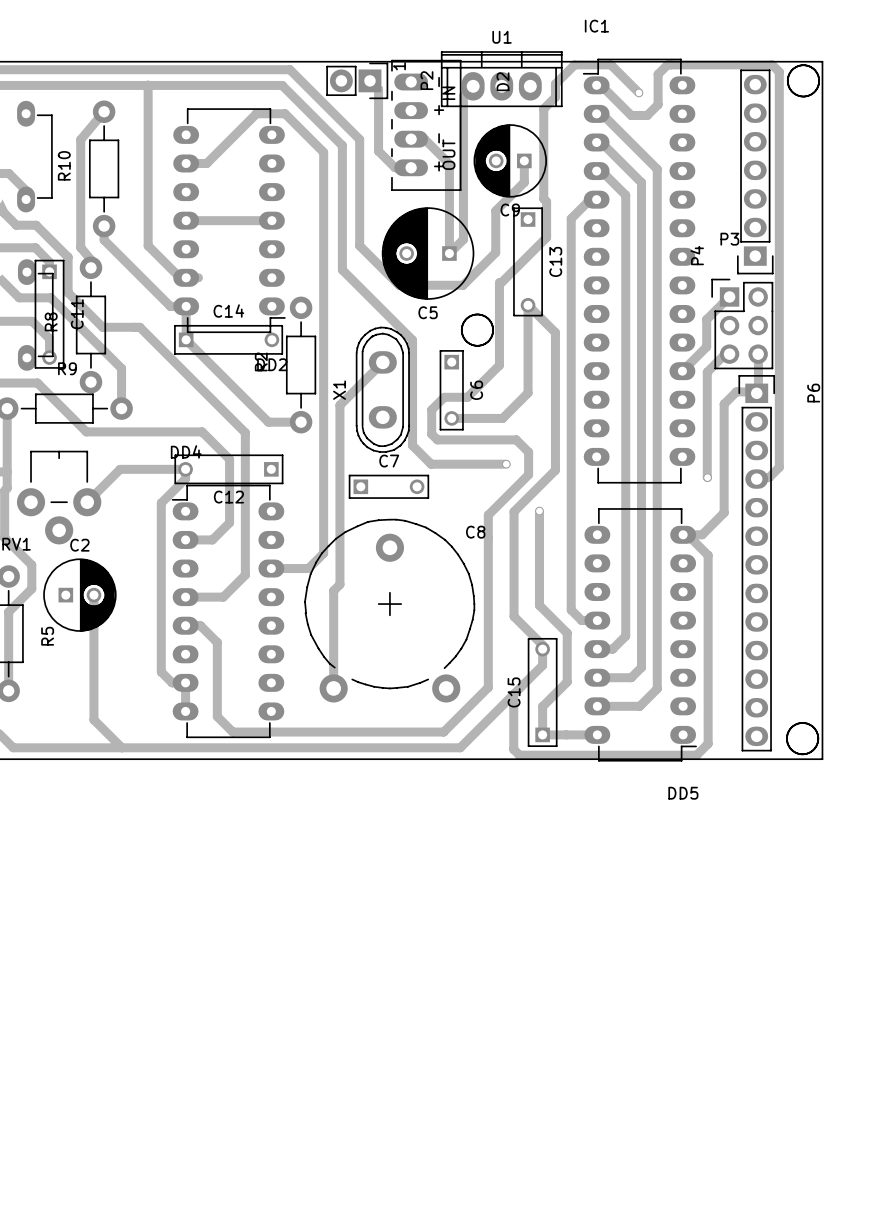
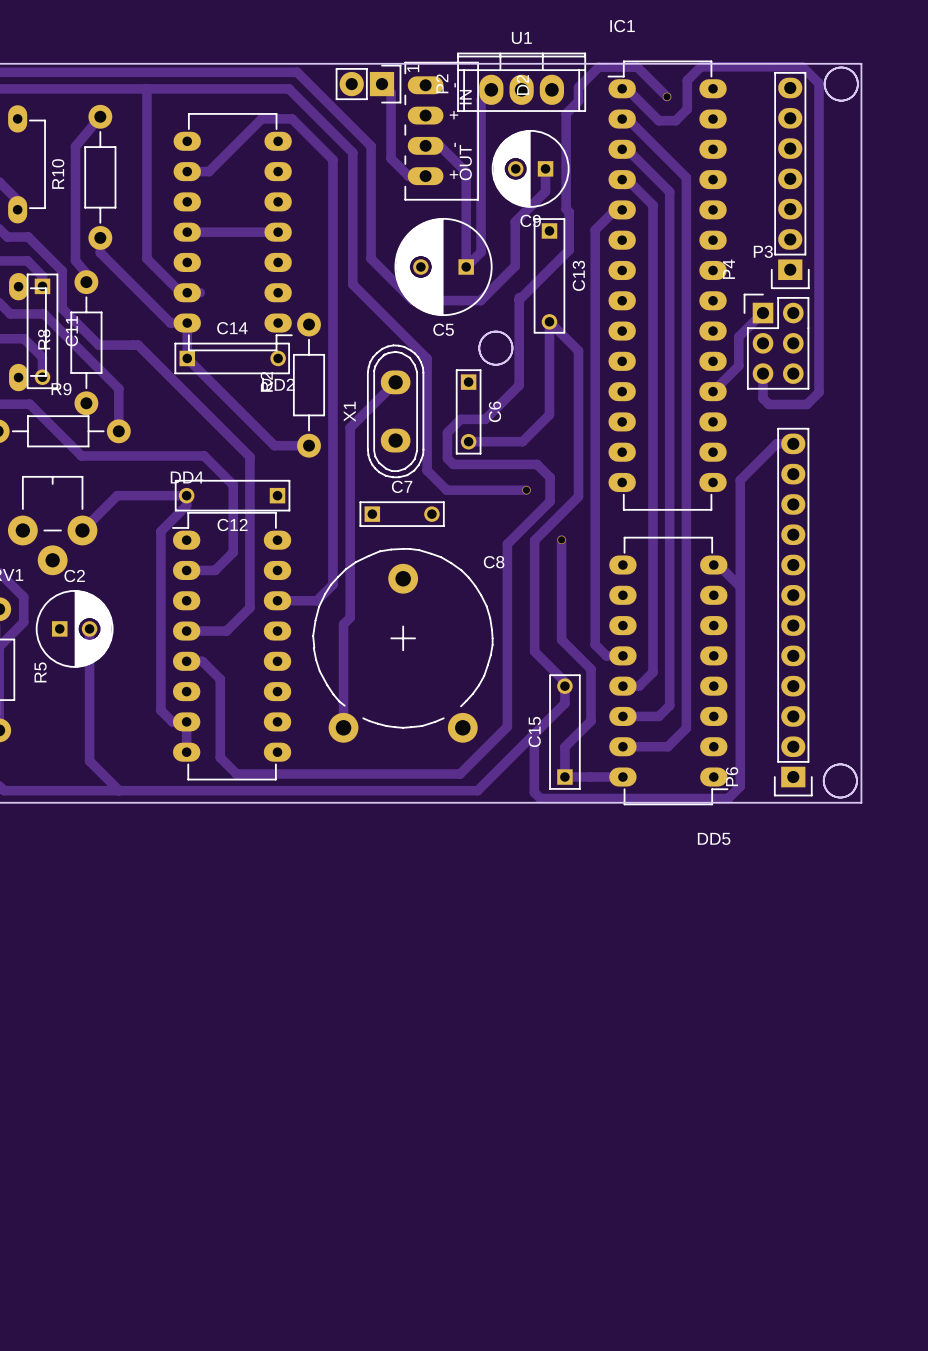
track: (658, 77) (658, 74) (667, 64) (772, 64) (779, 72) (779, 467) (769, 477) (758, 477) -> (687, 80) (700, 66) (802, 66) (819, 83) (819, 392) (806, 404) (769, 404) (763, 398) (763, 373)
track: (725, 354) (707, 372) (707, 477) -> none
track: (758, 354) (758, 391) (736, 391) (724, 404) (724, 512) (702, 534) (687, 534) -> none
P6 footprint: [738, 375, 776, 752] -> [773, 427, 813, 797]
P6 name position: P6 (813, 393) -> P6 (732, 776)
track: none -> (793, 443) (776, 443) (740, 480) (740, 586)
via: (707, 477) -> none

